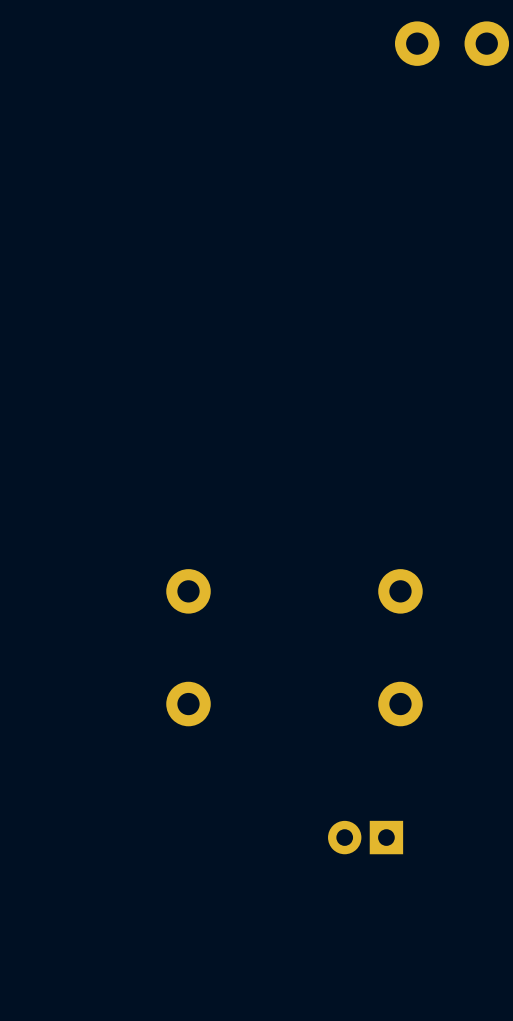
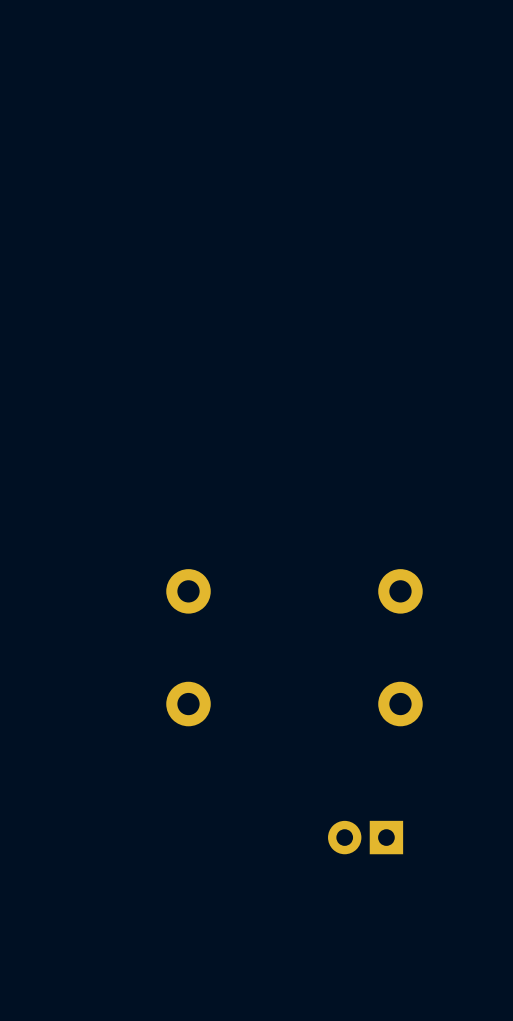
part: (452, 43) -> none

